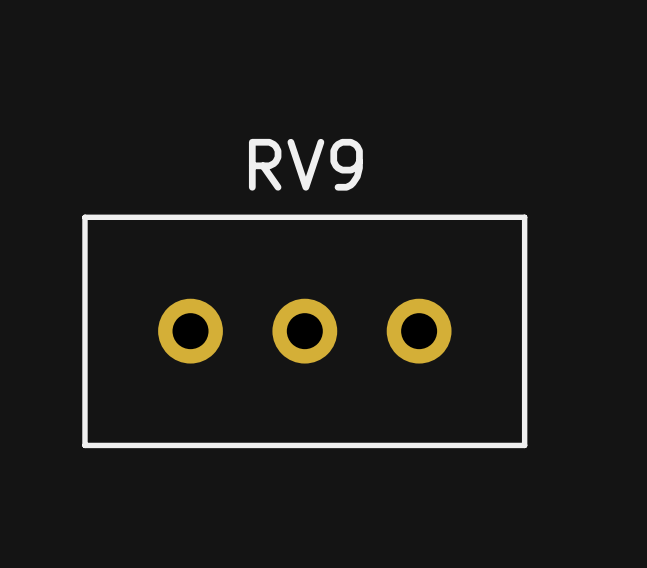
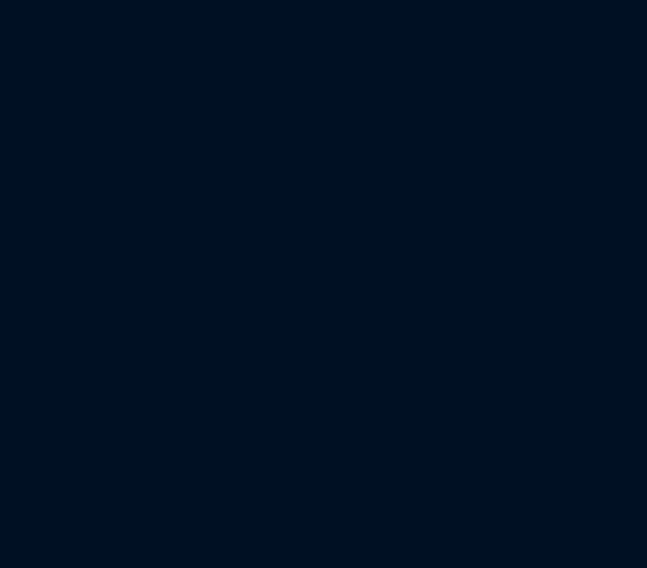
RV9: (304, 331) -> none

